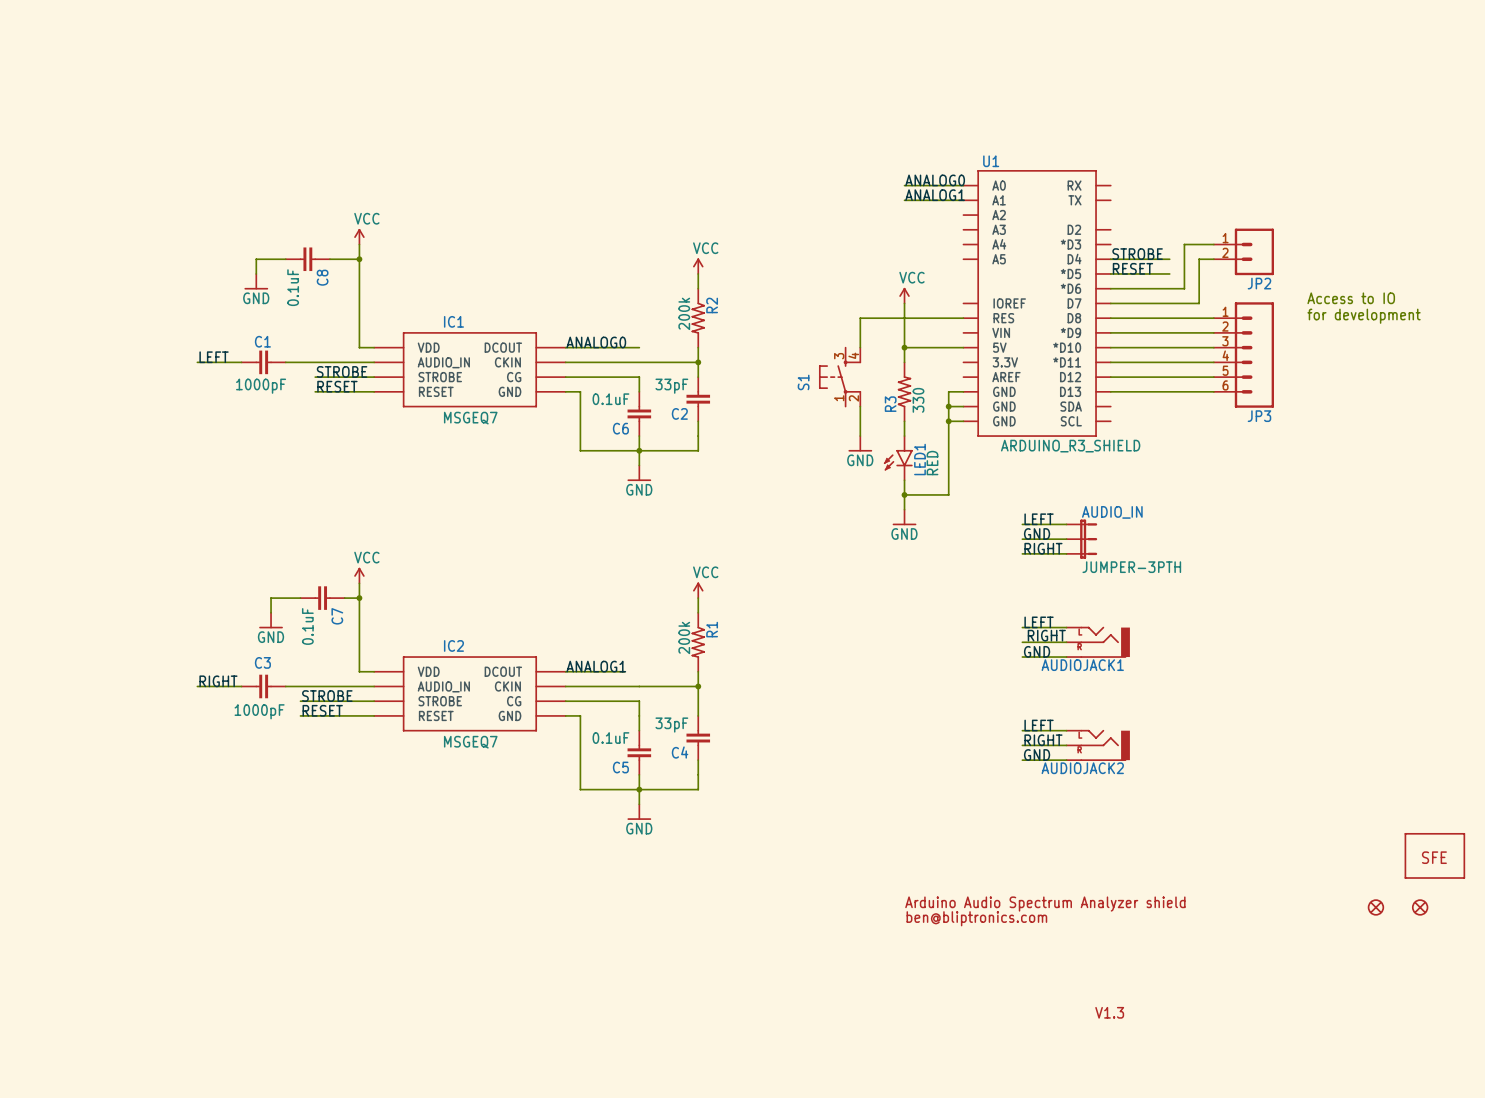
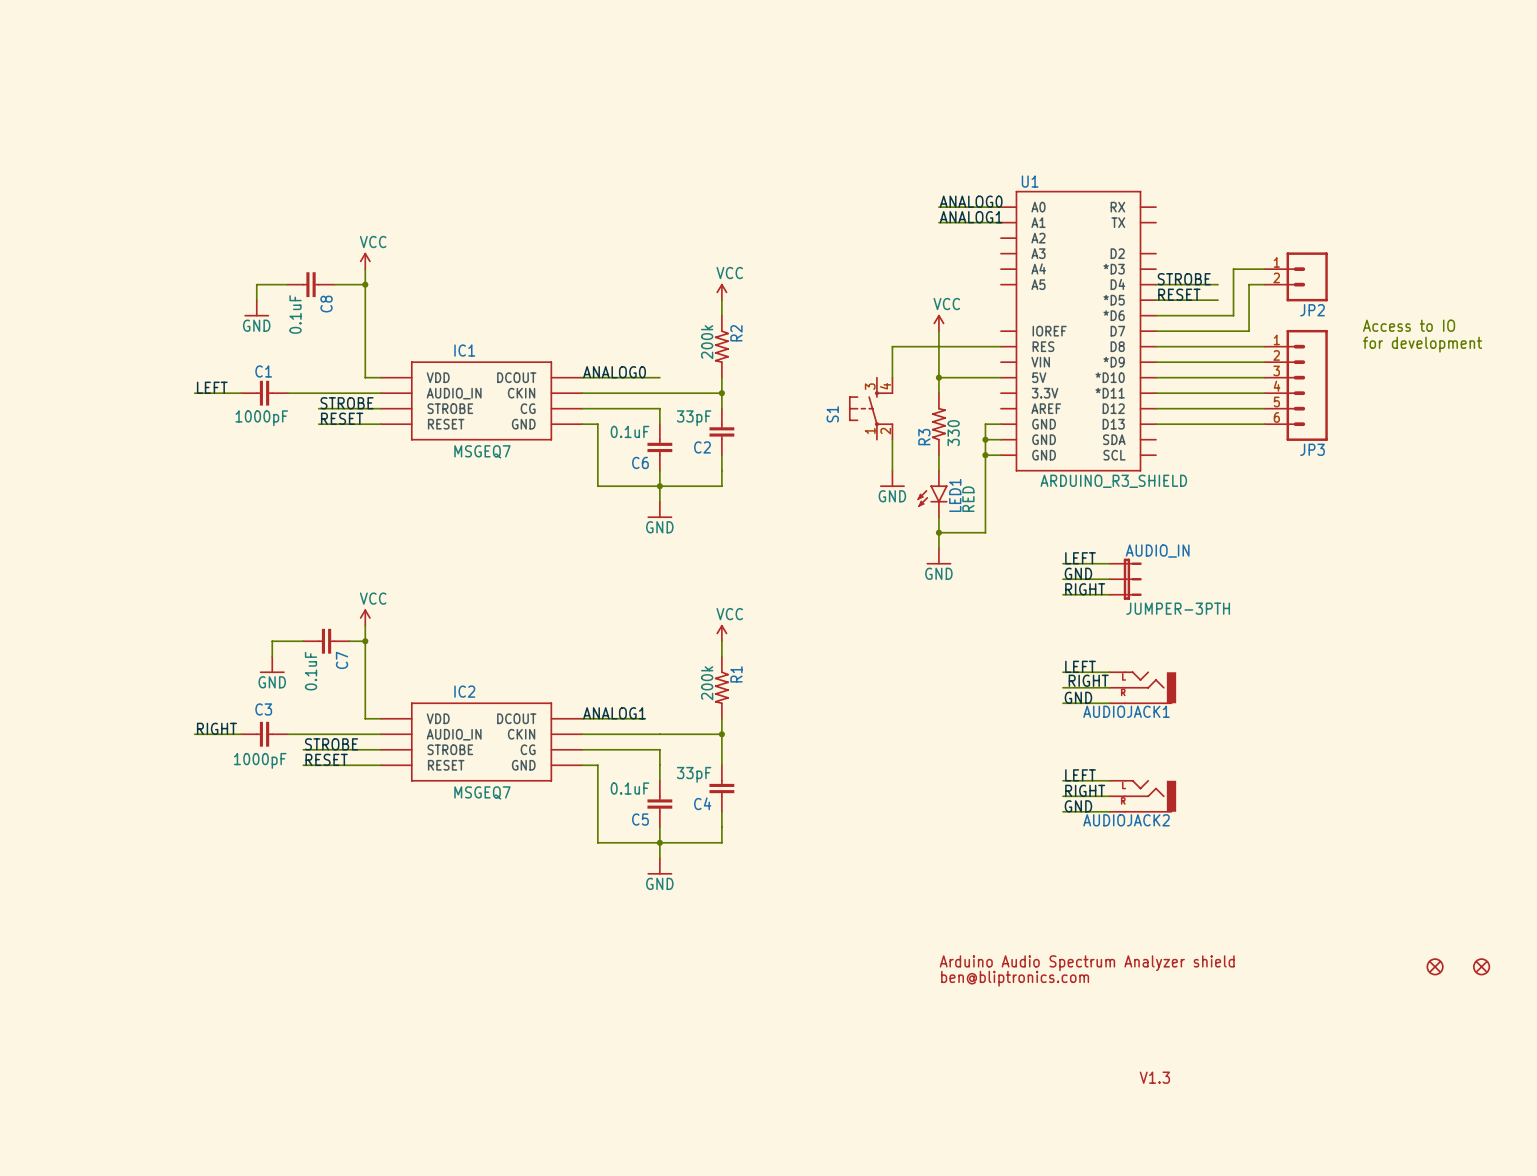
part: (1434, 855) -> none

